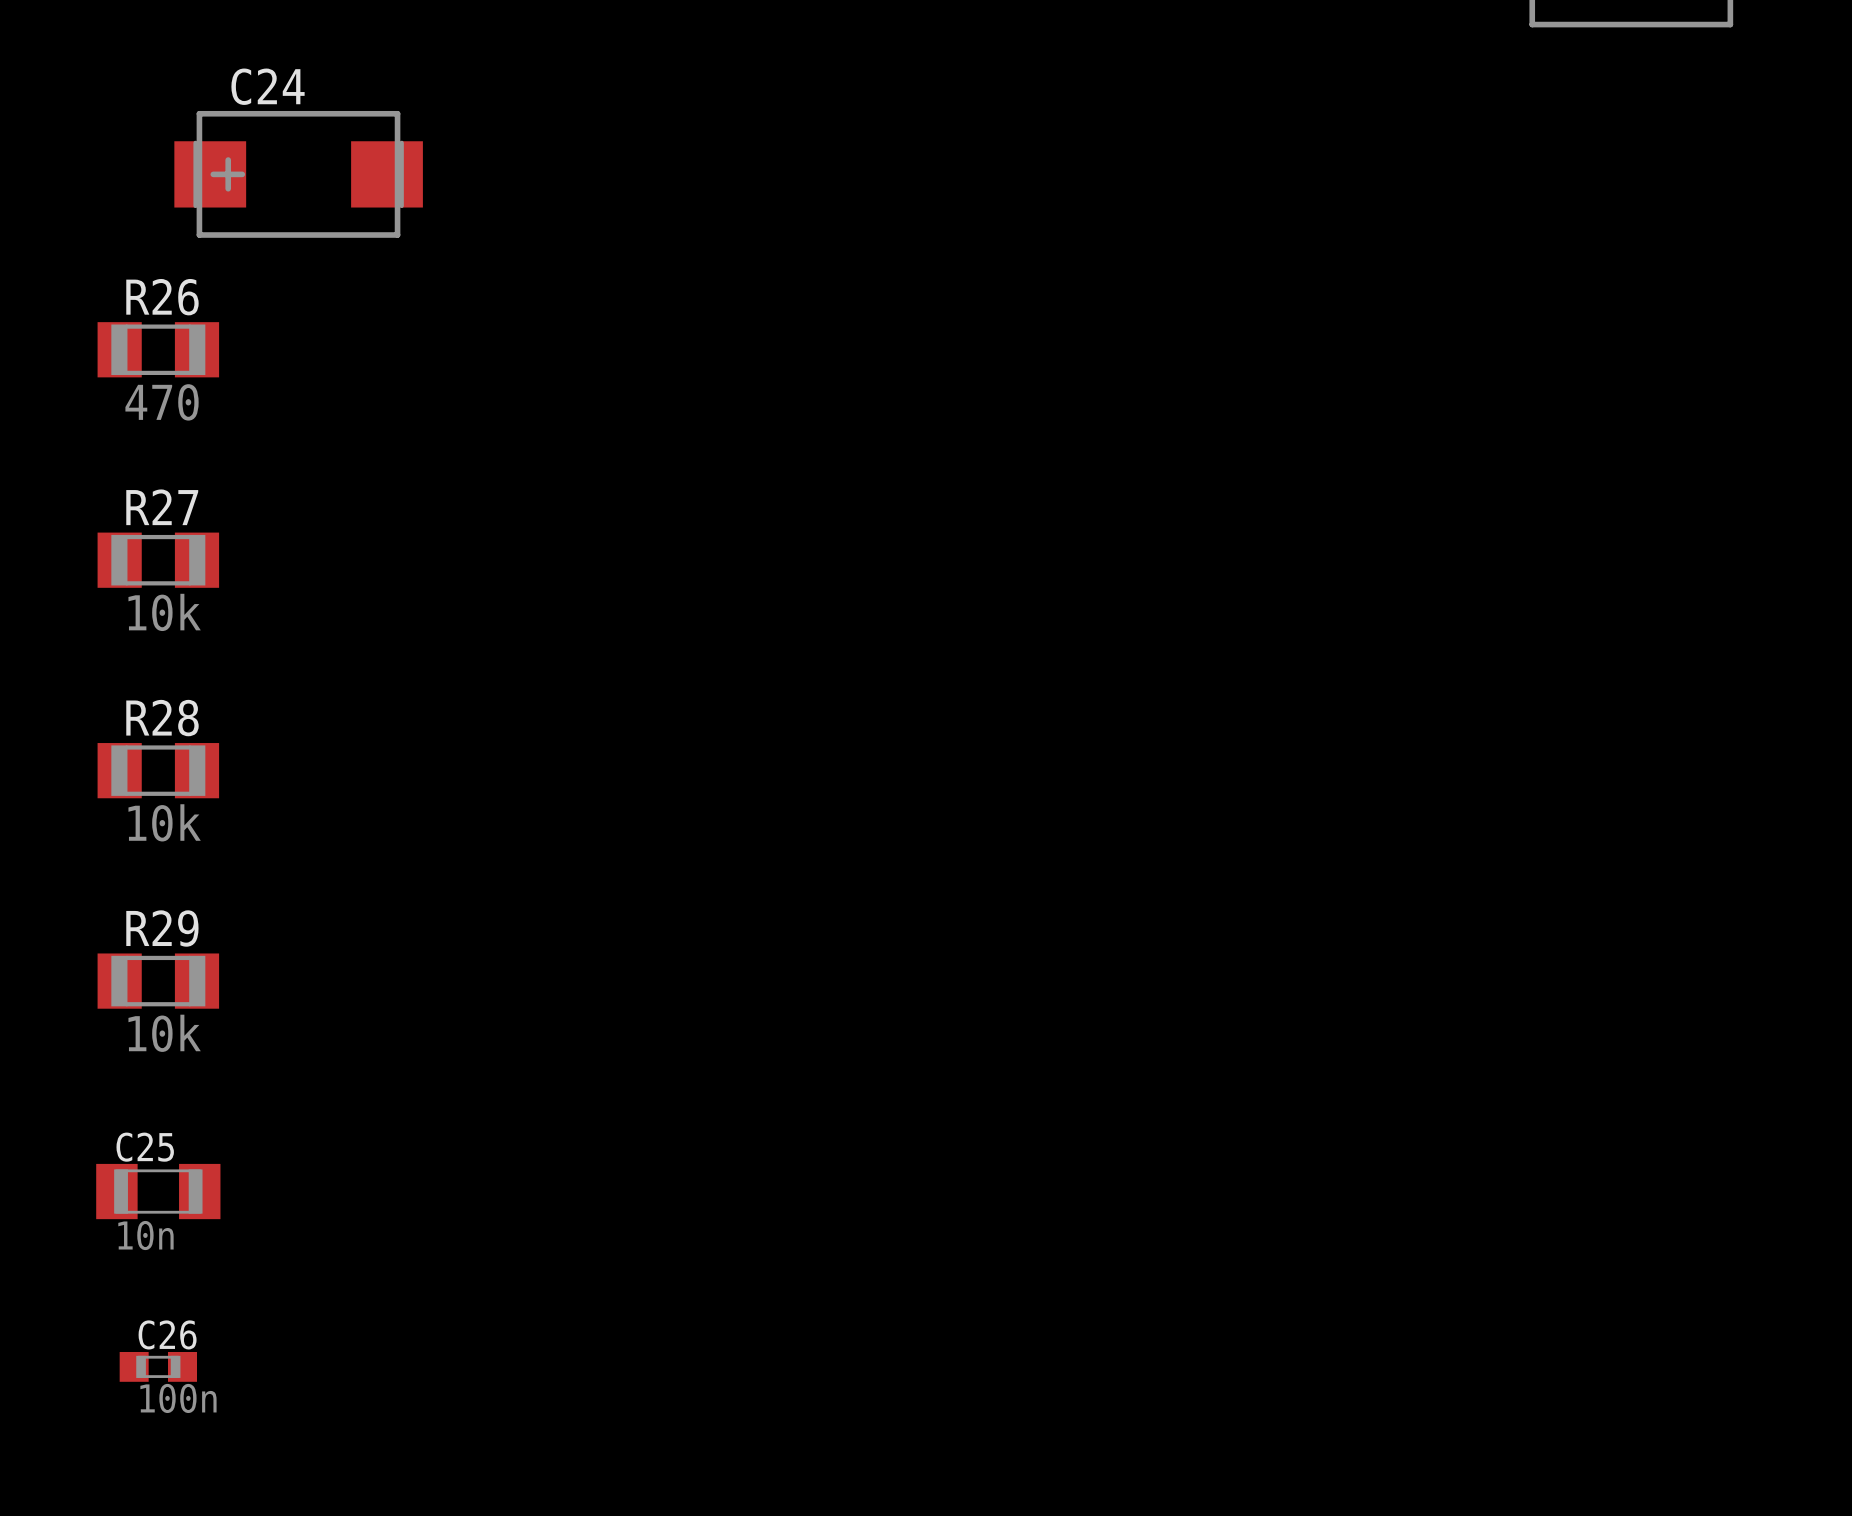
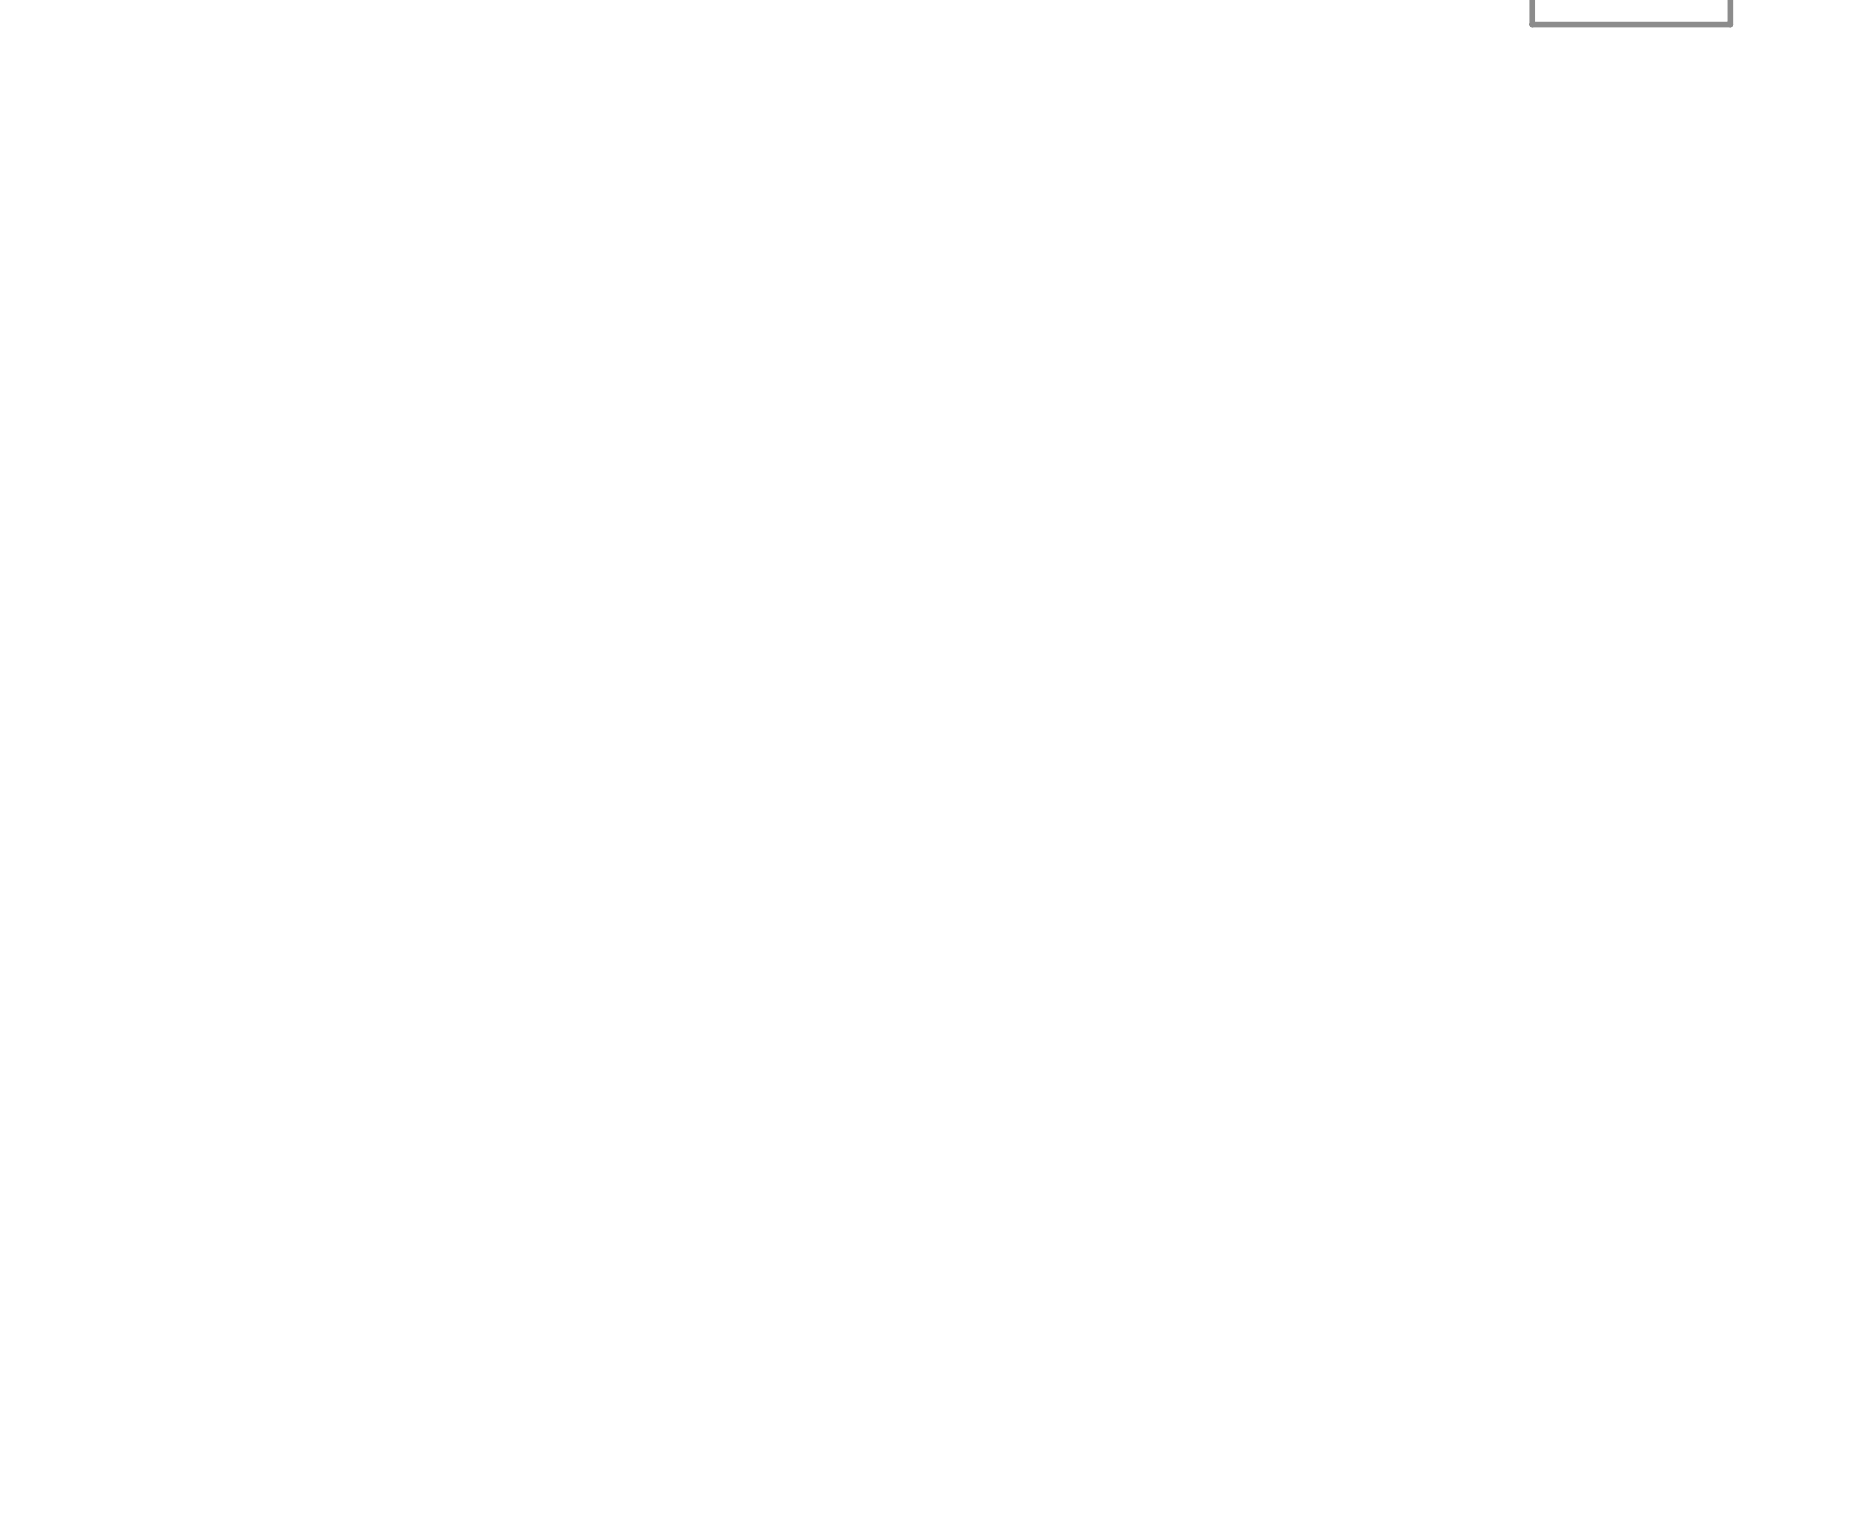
C24: (298, 174) -> none
R26: 470 (158, 349) -> none
R27: 10k (158, 560) -> none
R28: 10k (158, 770) -> none
R29: 10k (158, 981) -> none
C25: 10n (158, 1191) -> none
C26: 100n (158, 1366) -> none

